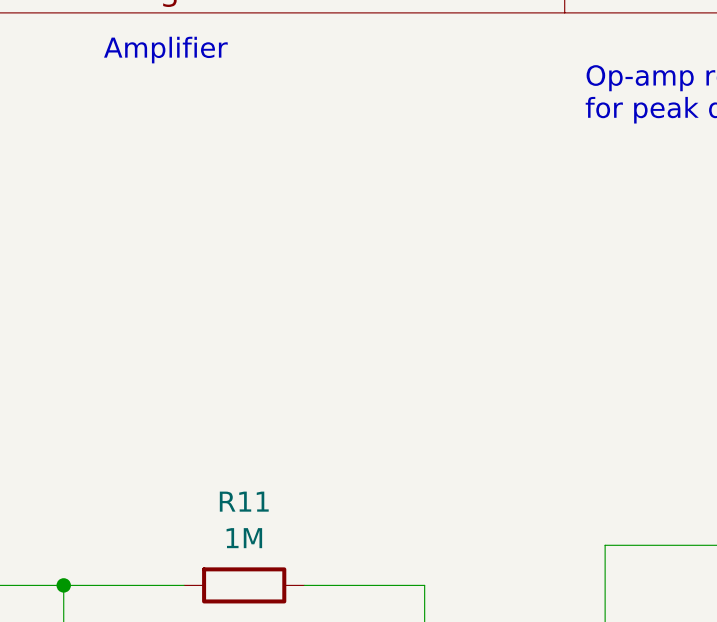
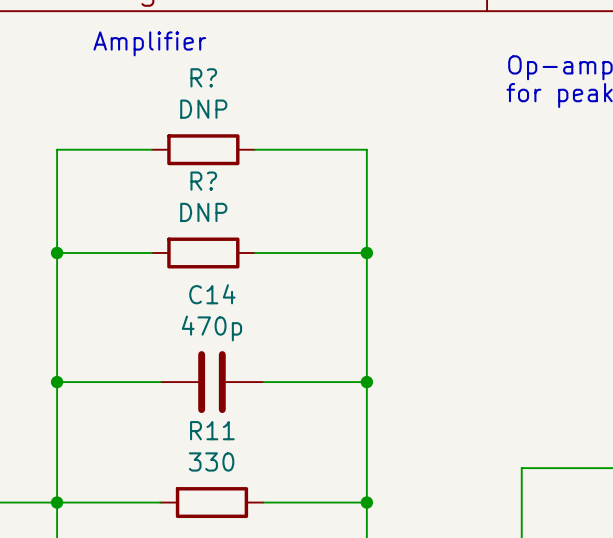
wire: none -> (151, 149) (57, 149) (57, 502)
R?: none -> DNP (203, 149)
wire: none -> (255, 149) (366, 149) (366, 502)
wire: none -> (57, 253) (151, 253)
junction: none -> (57, 253)
R?: none -> DNP (203, 253)
wire: none -> (255, 253) (366, 253)
junction: none -> (366, 253)
wire: none -> (57, 382) (160, 382)
junction: none -> (57, 382)
C14: none -> 470p (211, 382)
wire: none -> (263, 382) (366, 382)
junction: none -> (366, 382)
R11 value: 1M (244, 538) -> 330 (211, 461)
junction: none -> (366, 502)

